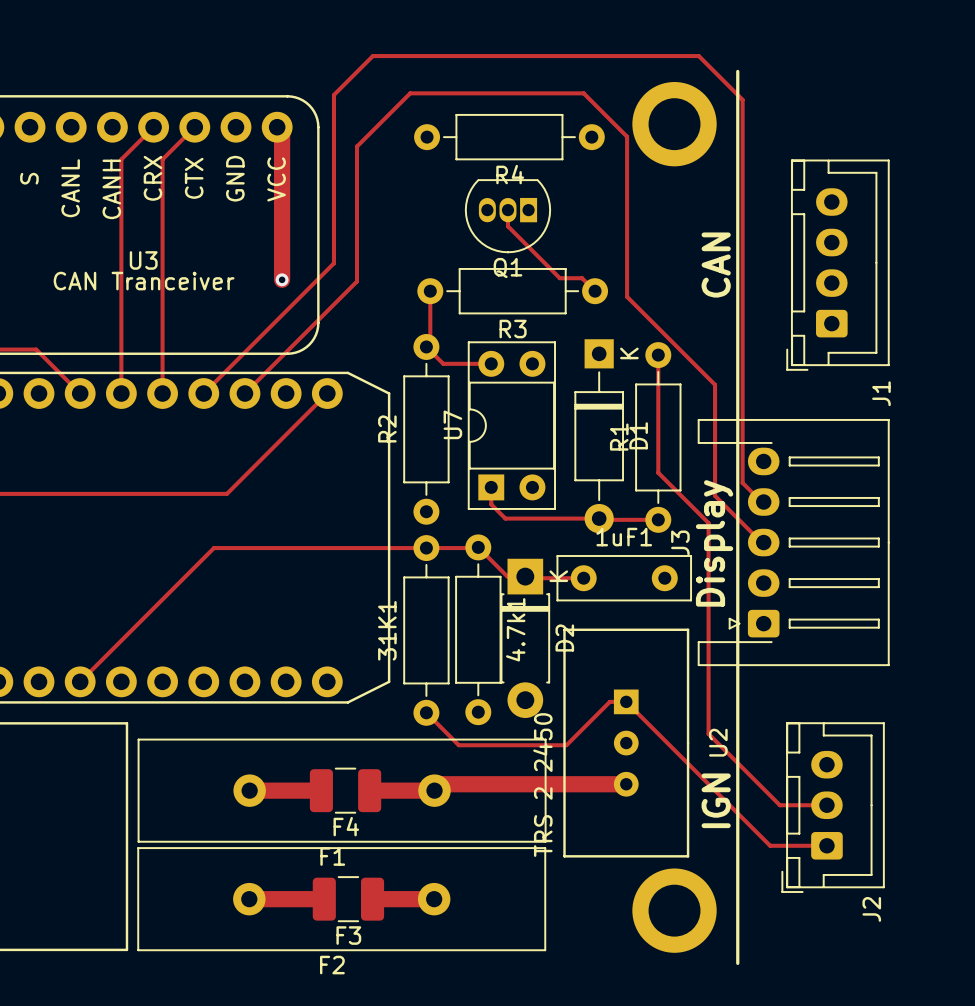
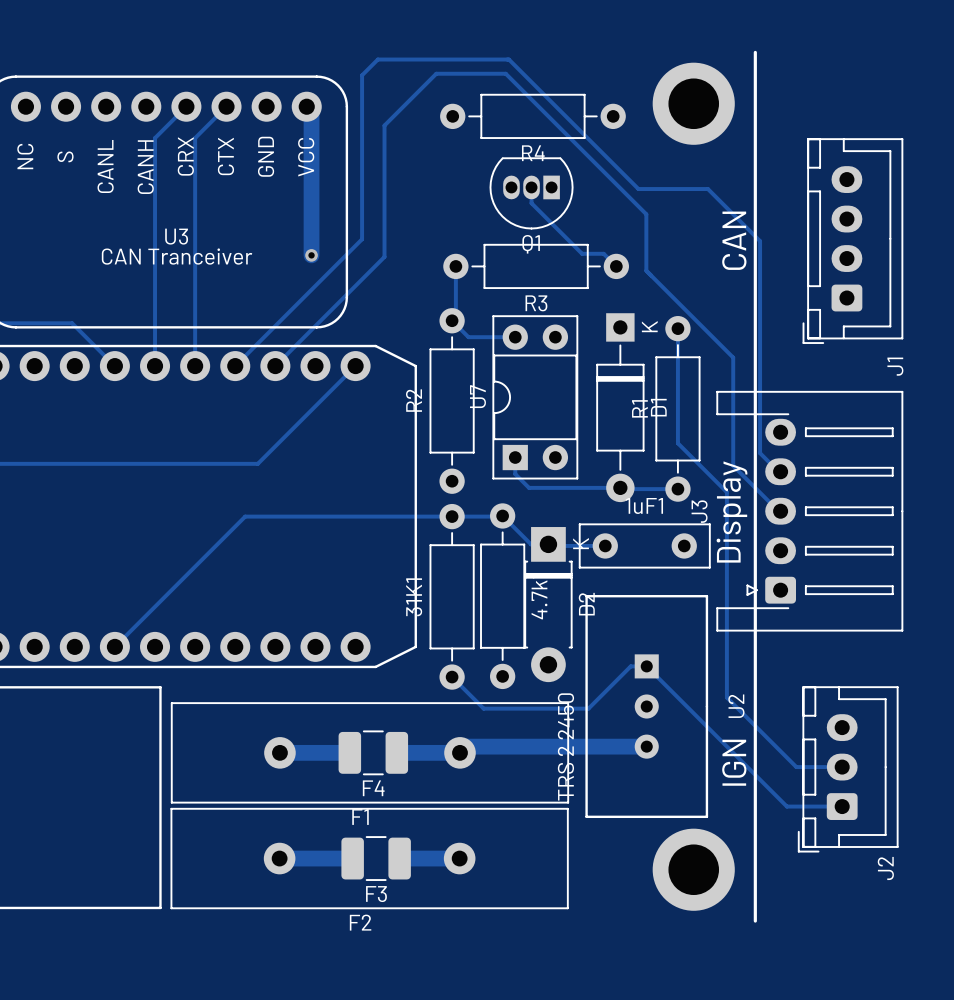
track: (350, 78) (372, 56) (698, 56) (742, 99) (742, 265) -> (377, 59) (508, 59) (638, 189) (707, 189) (760, 241)
track: (481, 93) (583, 93) (627, 136) (627, 296) -> (505, 73) (646, 214) (647, 271)

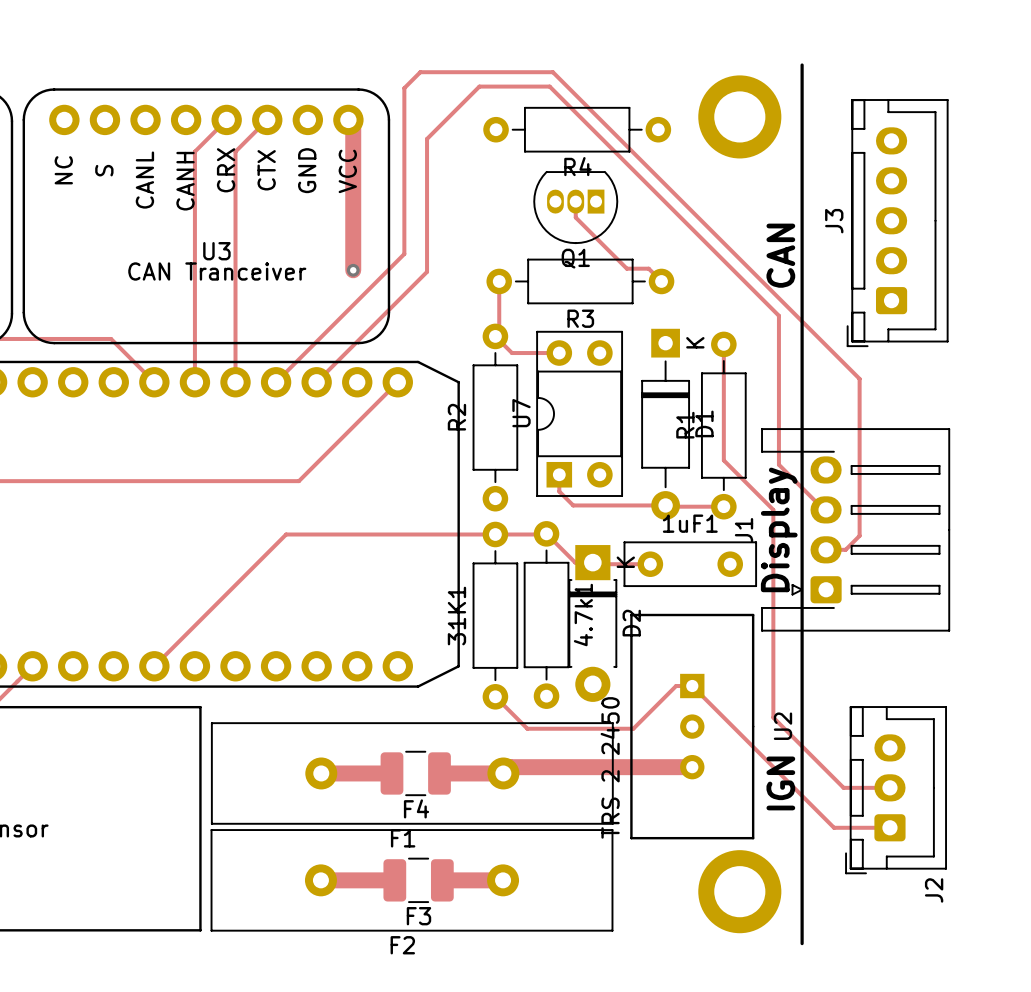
J1 footprint: [802, 138, 904, 344] -> [761, 428, 951, 632]
track: (638, 189) (707, 189) (760, 241) (760, 453) (780, 471) -> (683, 203) (859, 378) (859, 535) (845, 549) (824, 549)
track: (646, 214) (646, 270) (733, 357) (733, 465) (780, 511) -> (691, 228) (778, 315) (778, 464) (826, 509)
J1 name position: J1 (895, 366) -> J1 (744, 530)
J3 footprint: [716, 390, 904, 632] -> [846, 99, 949, 348]
J3 name position: J3 (699, 511) -> J3 (834, 221)

